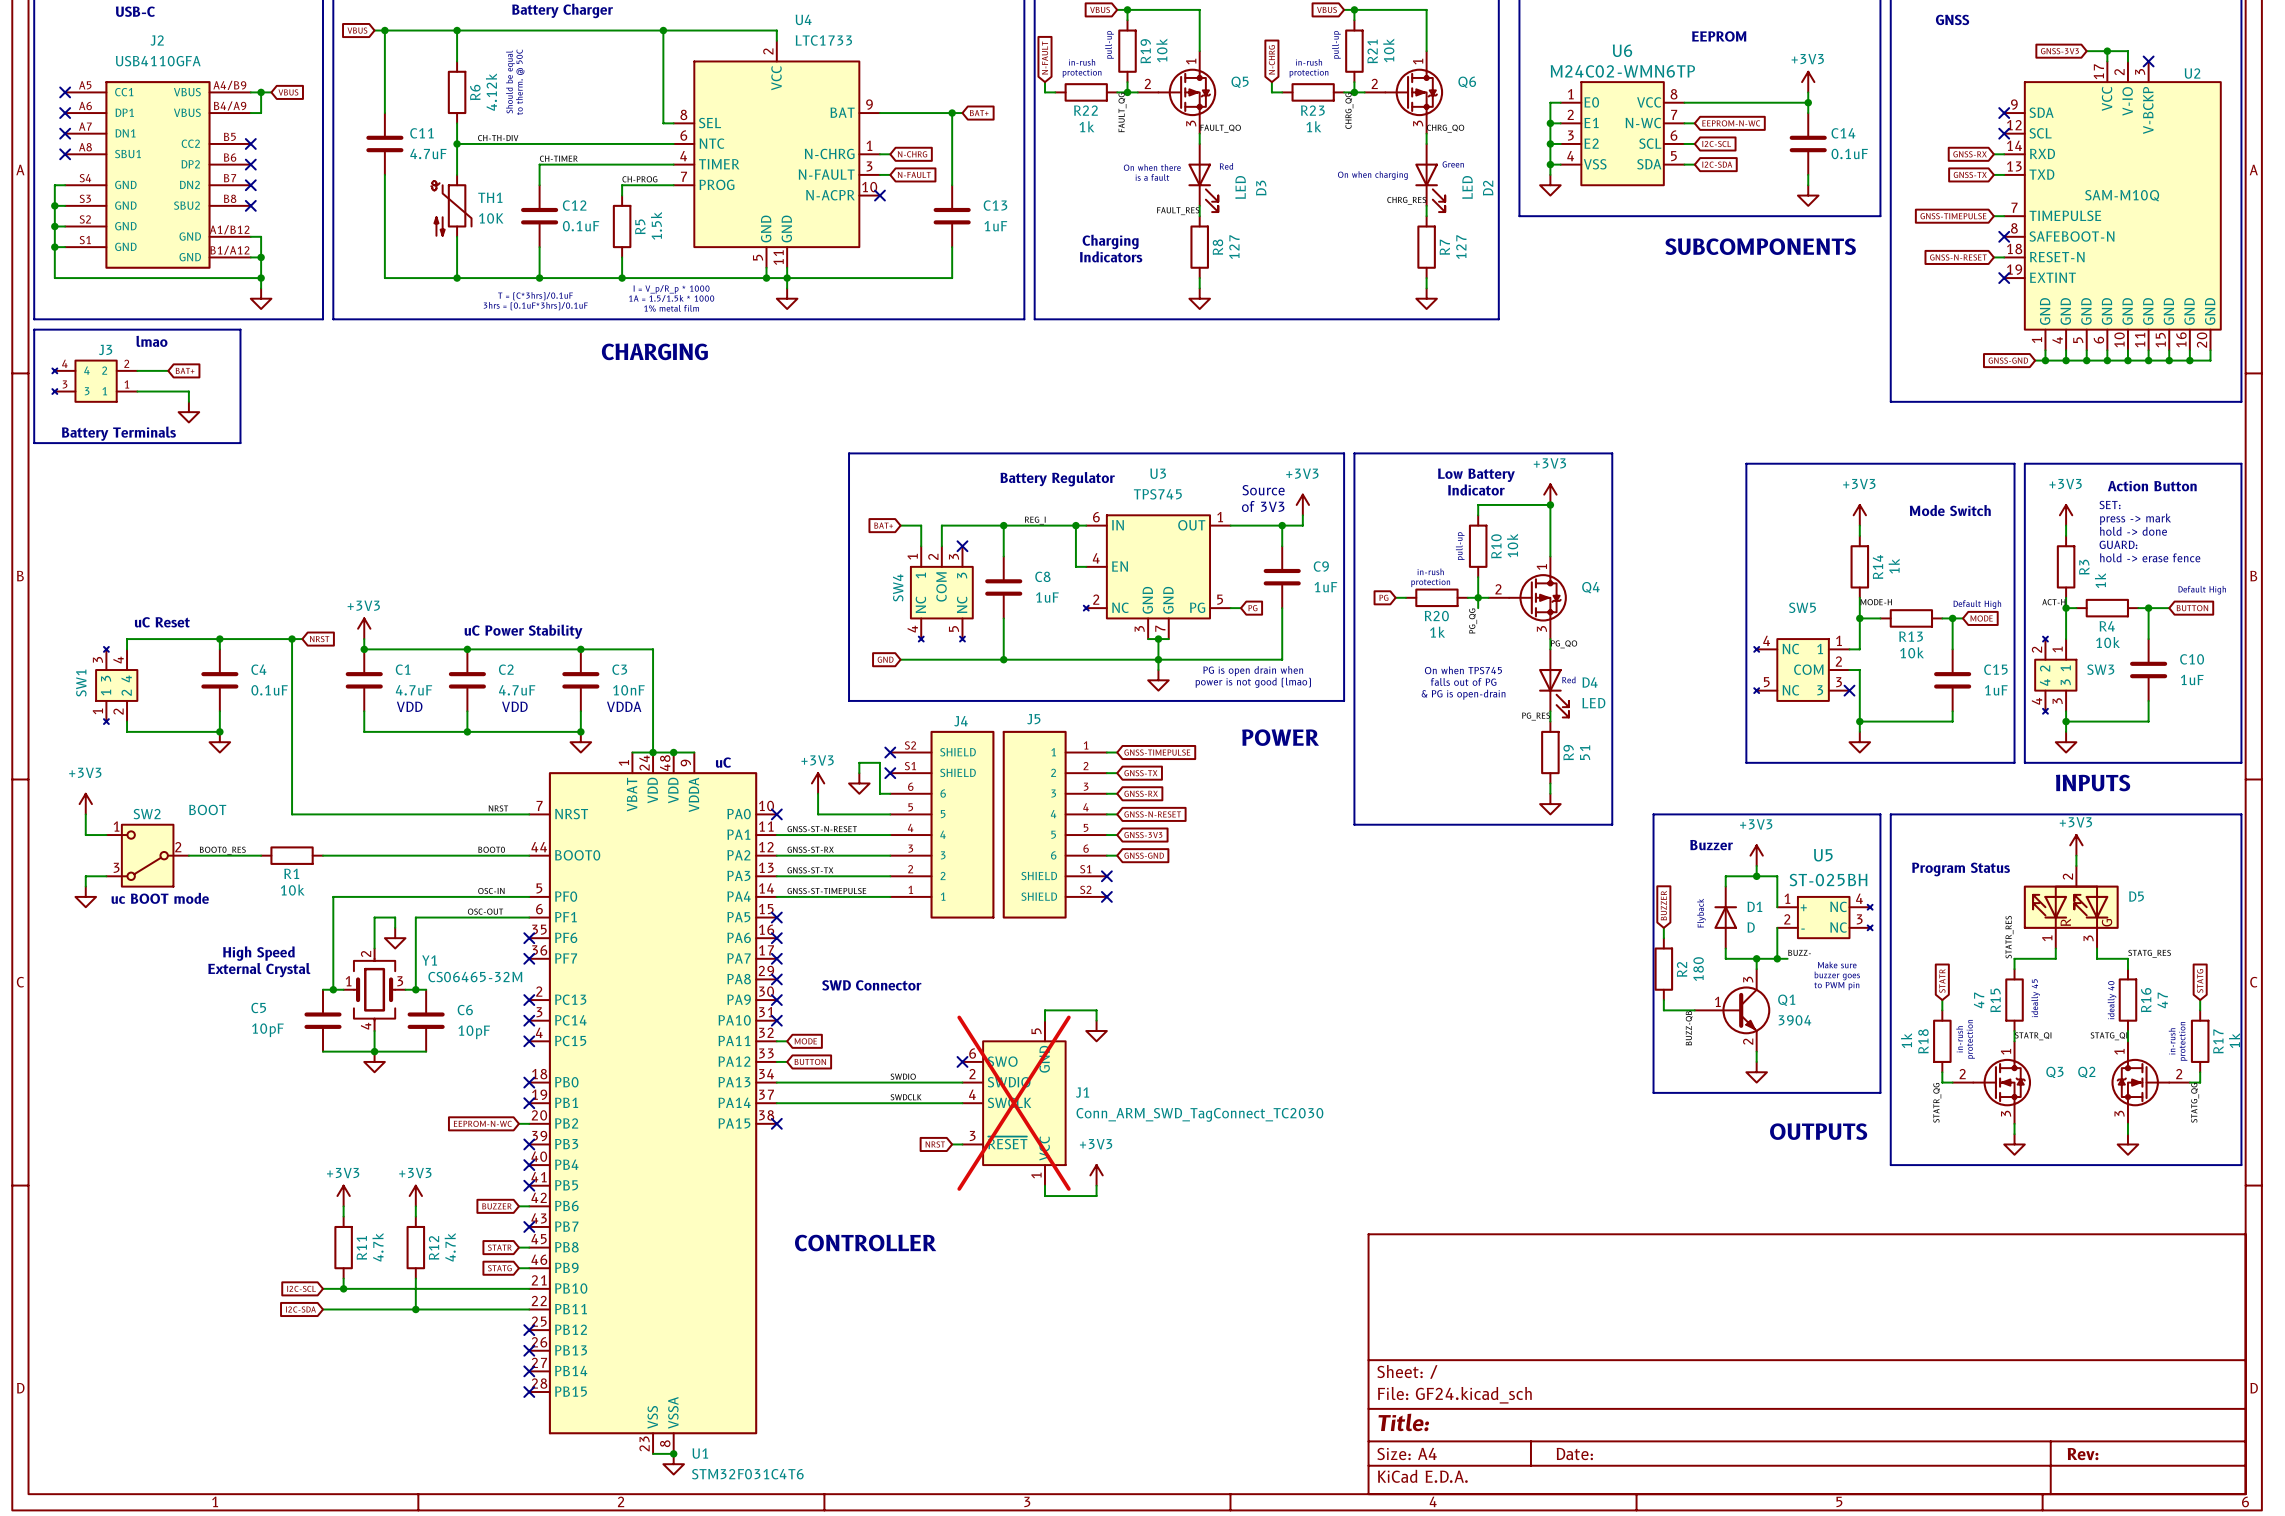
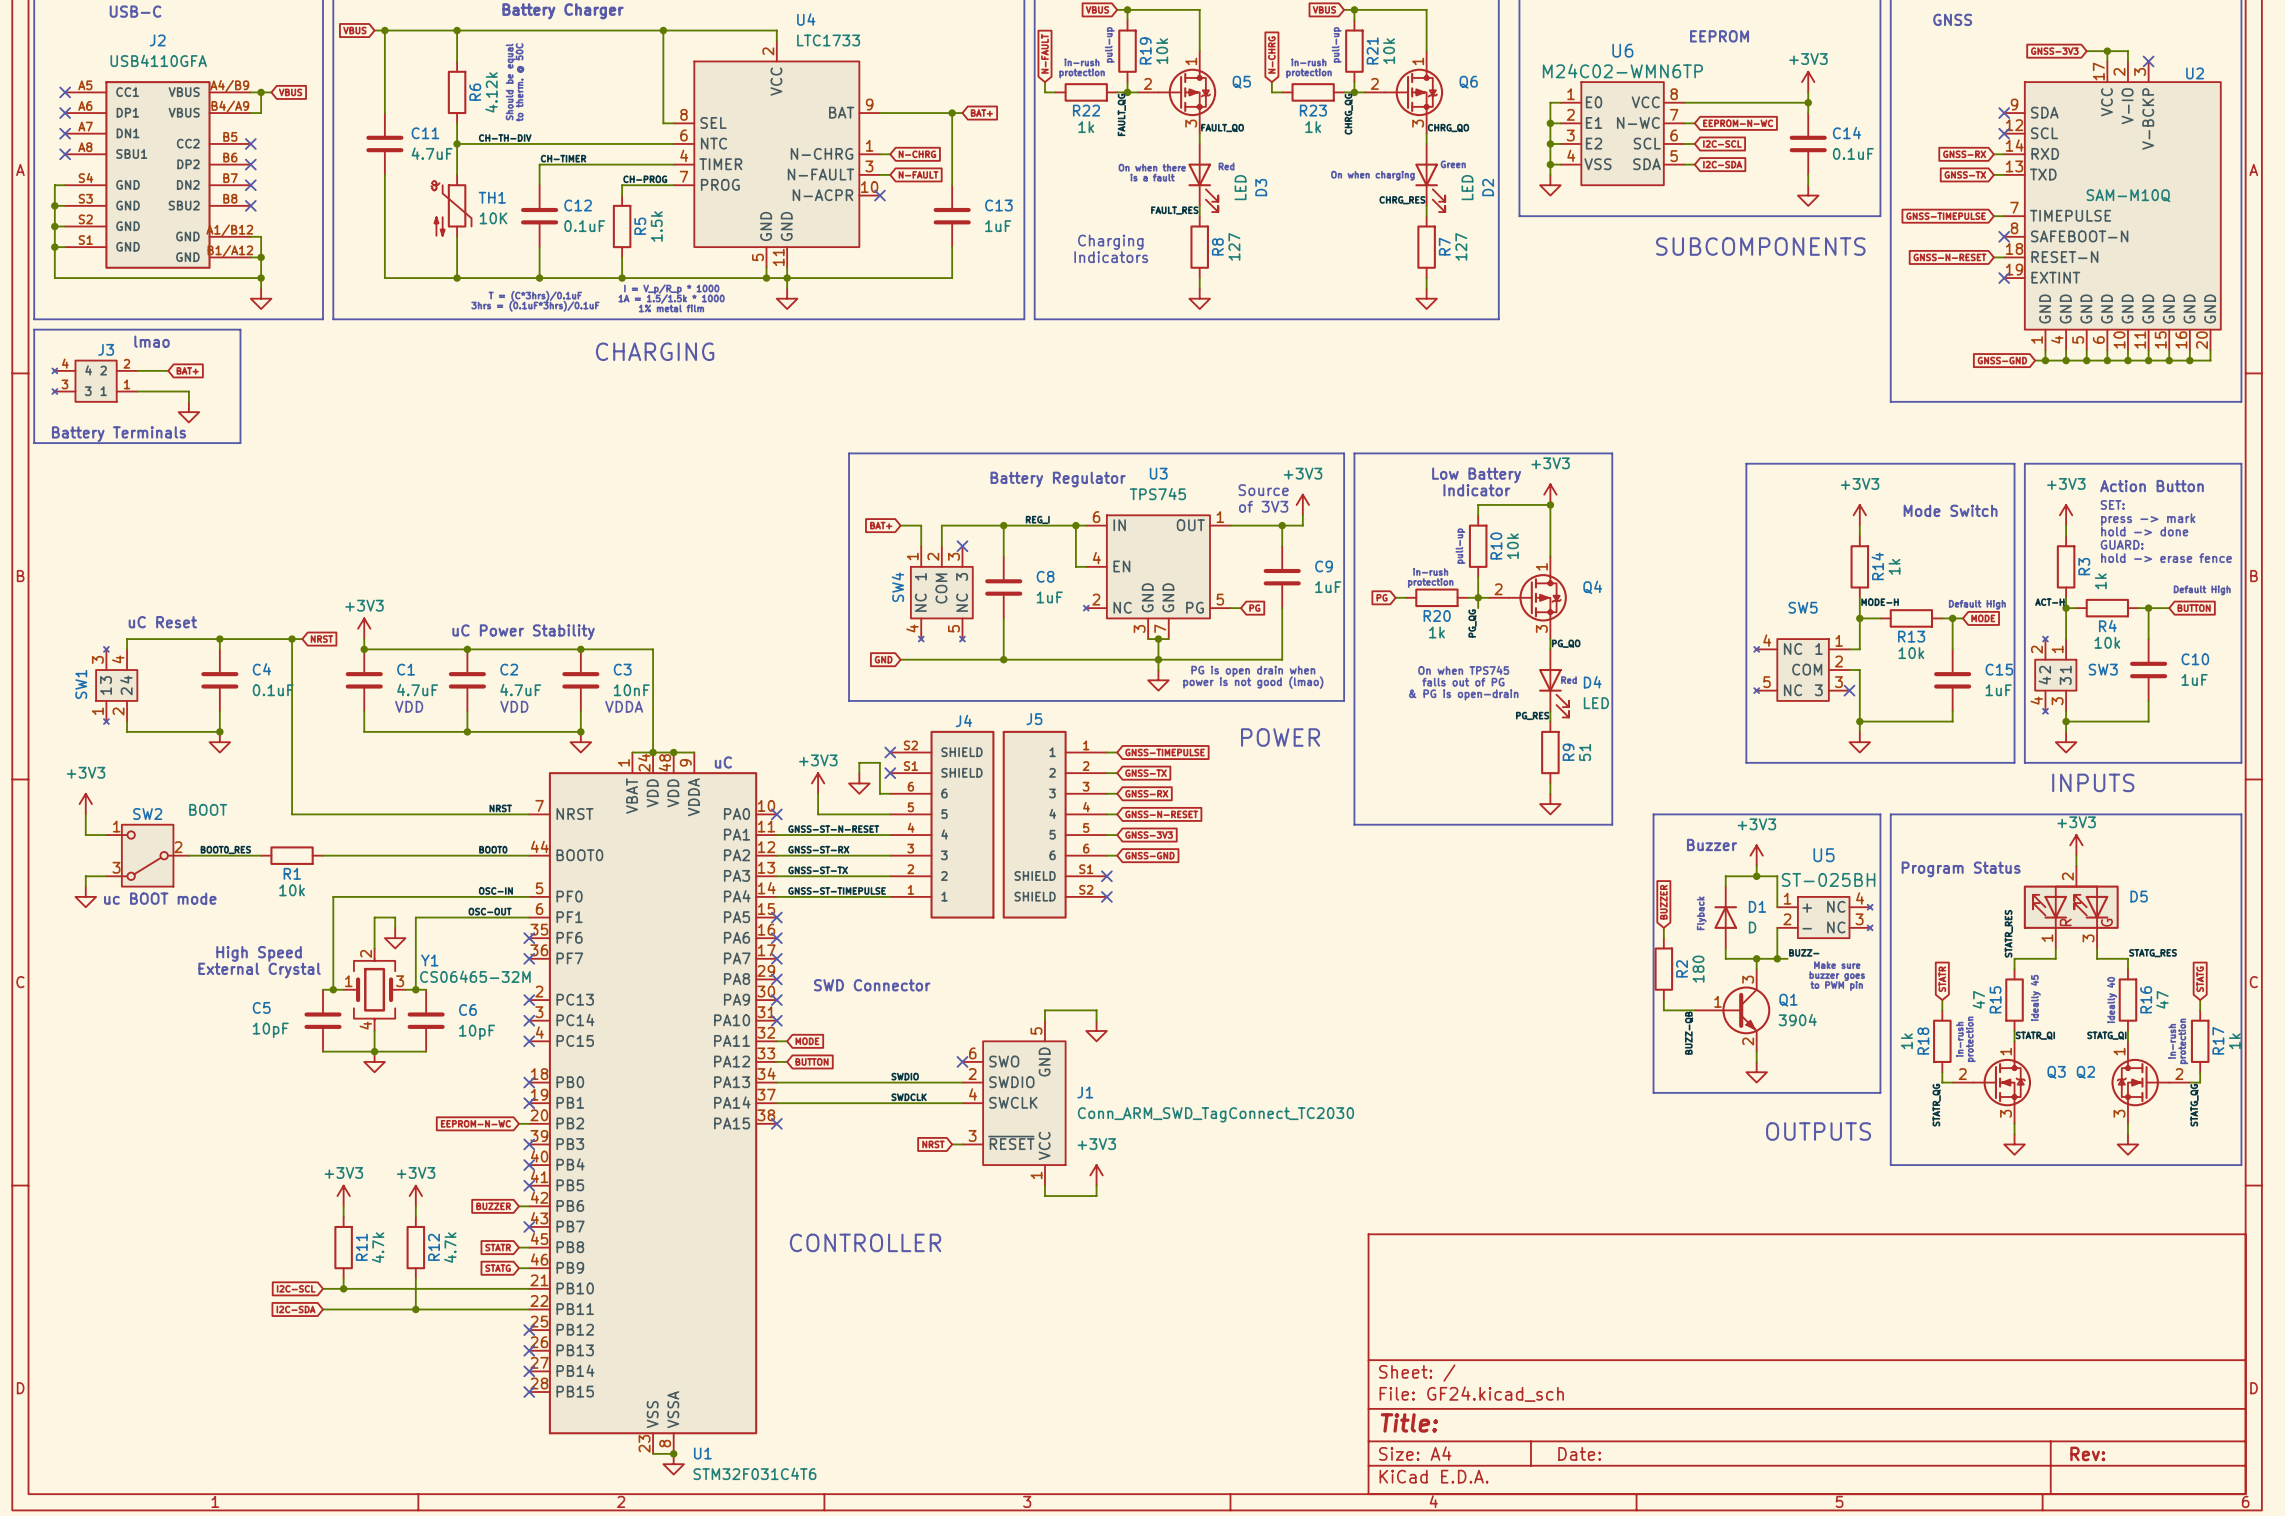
J1 do-not-place cross: (1014, 1103) -> none

